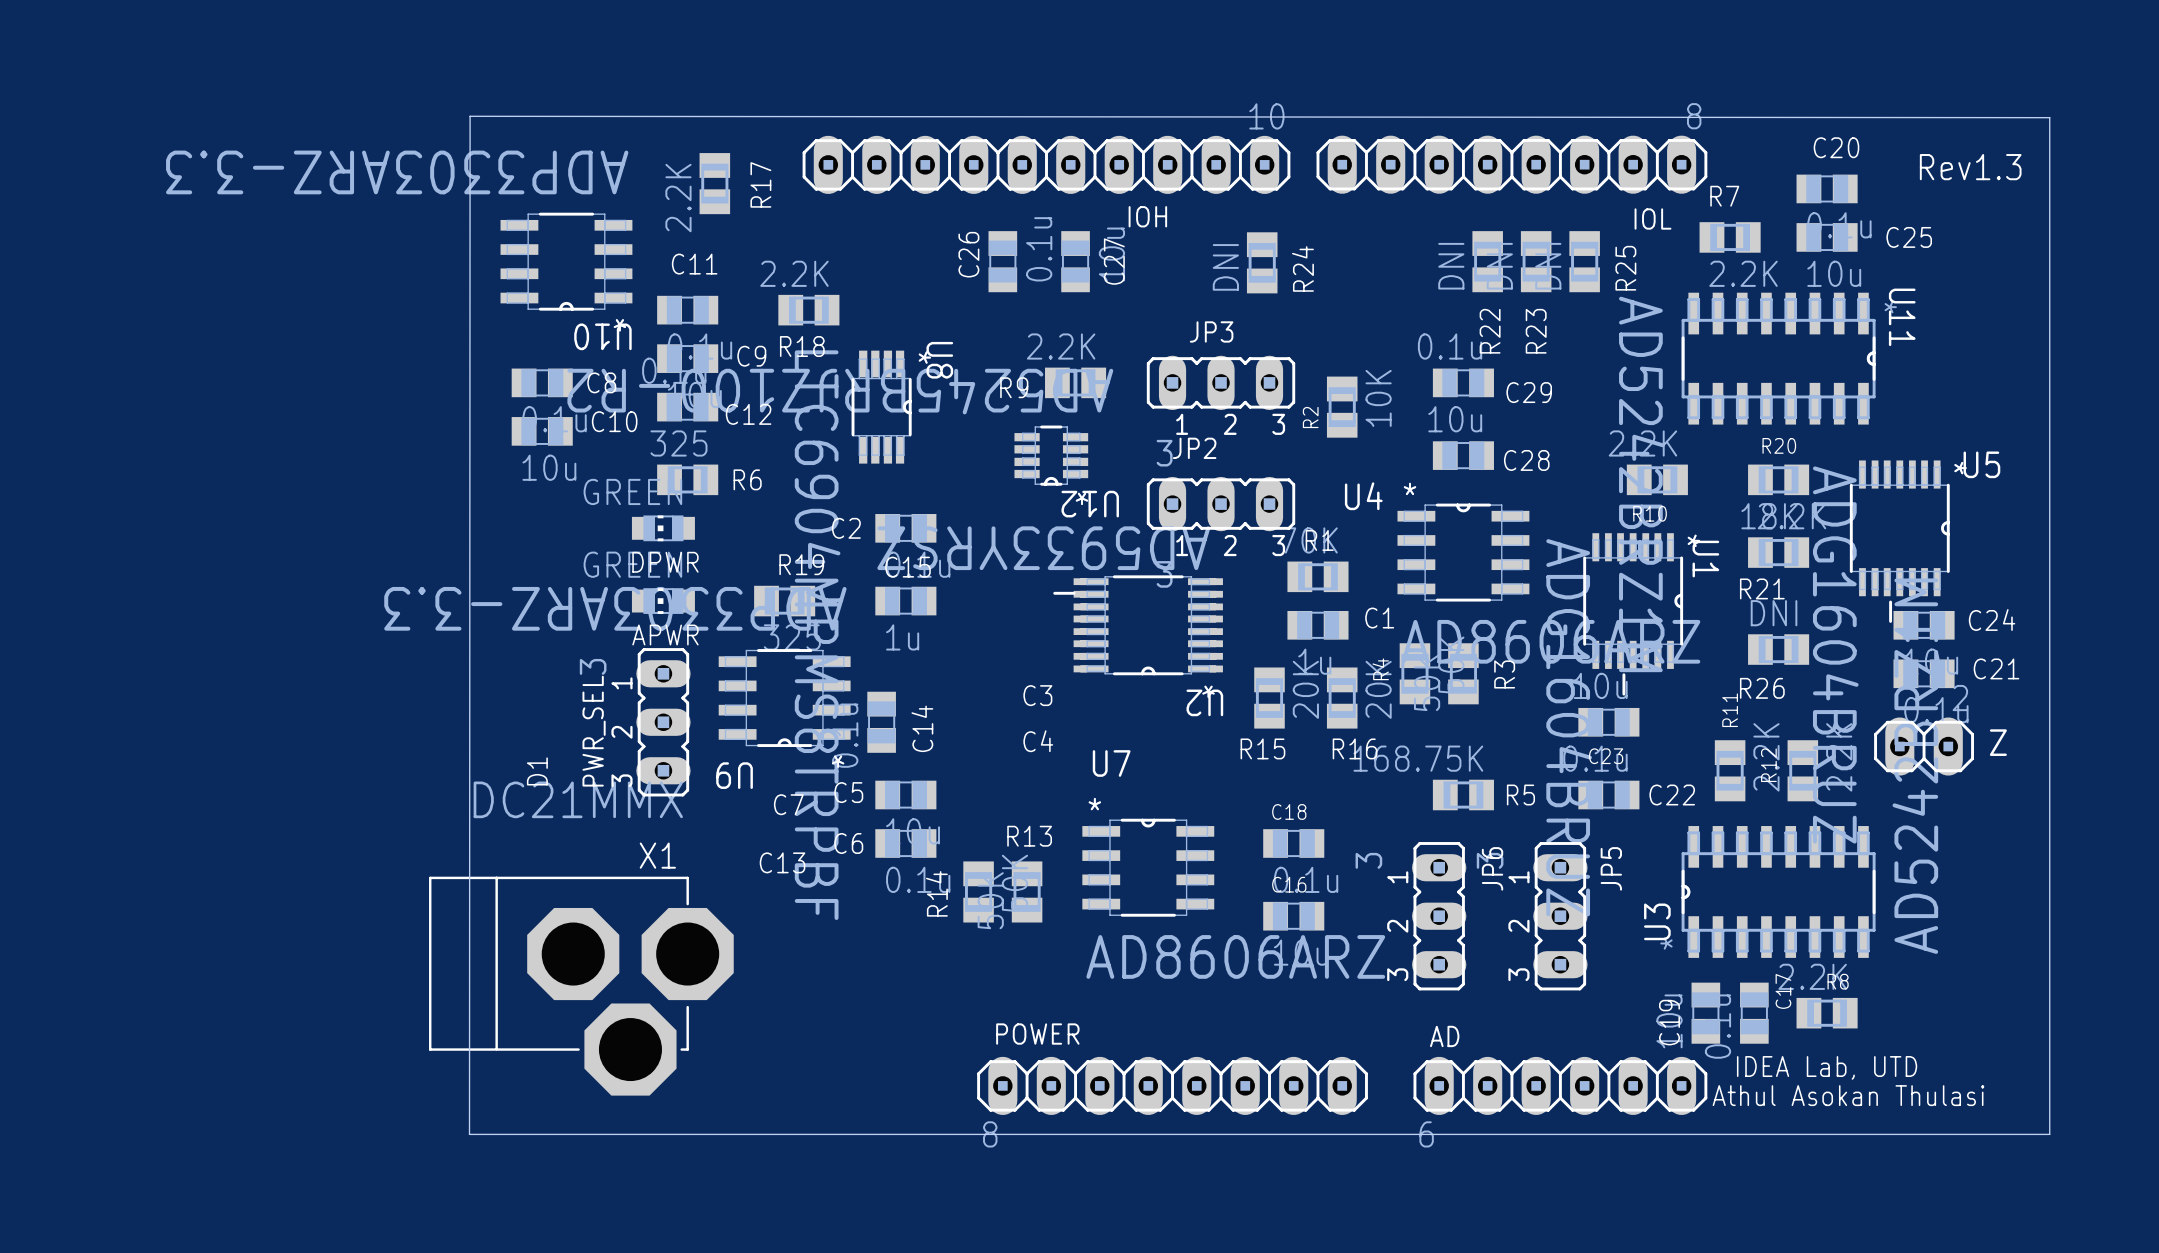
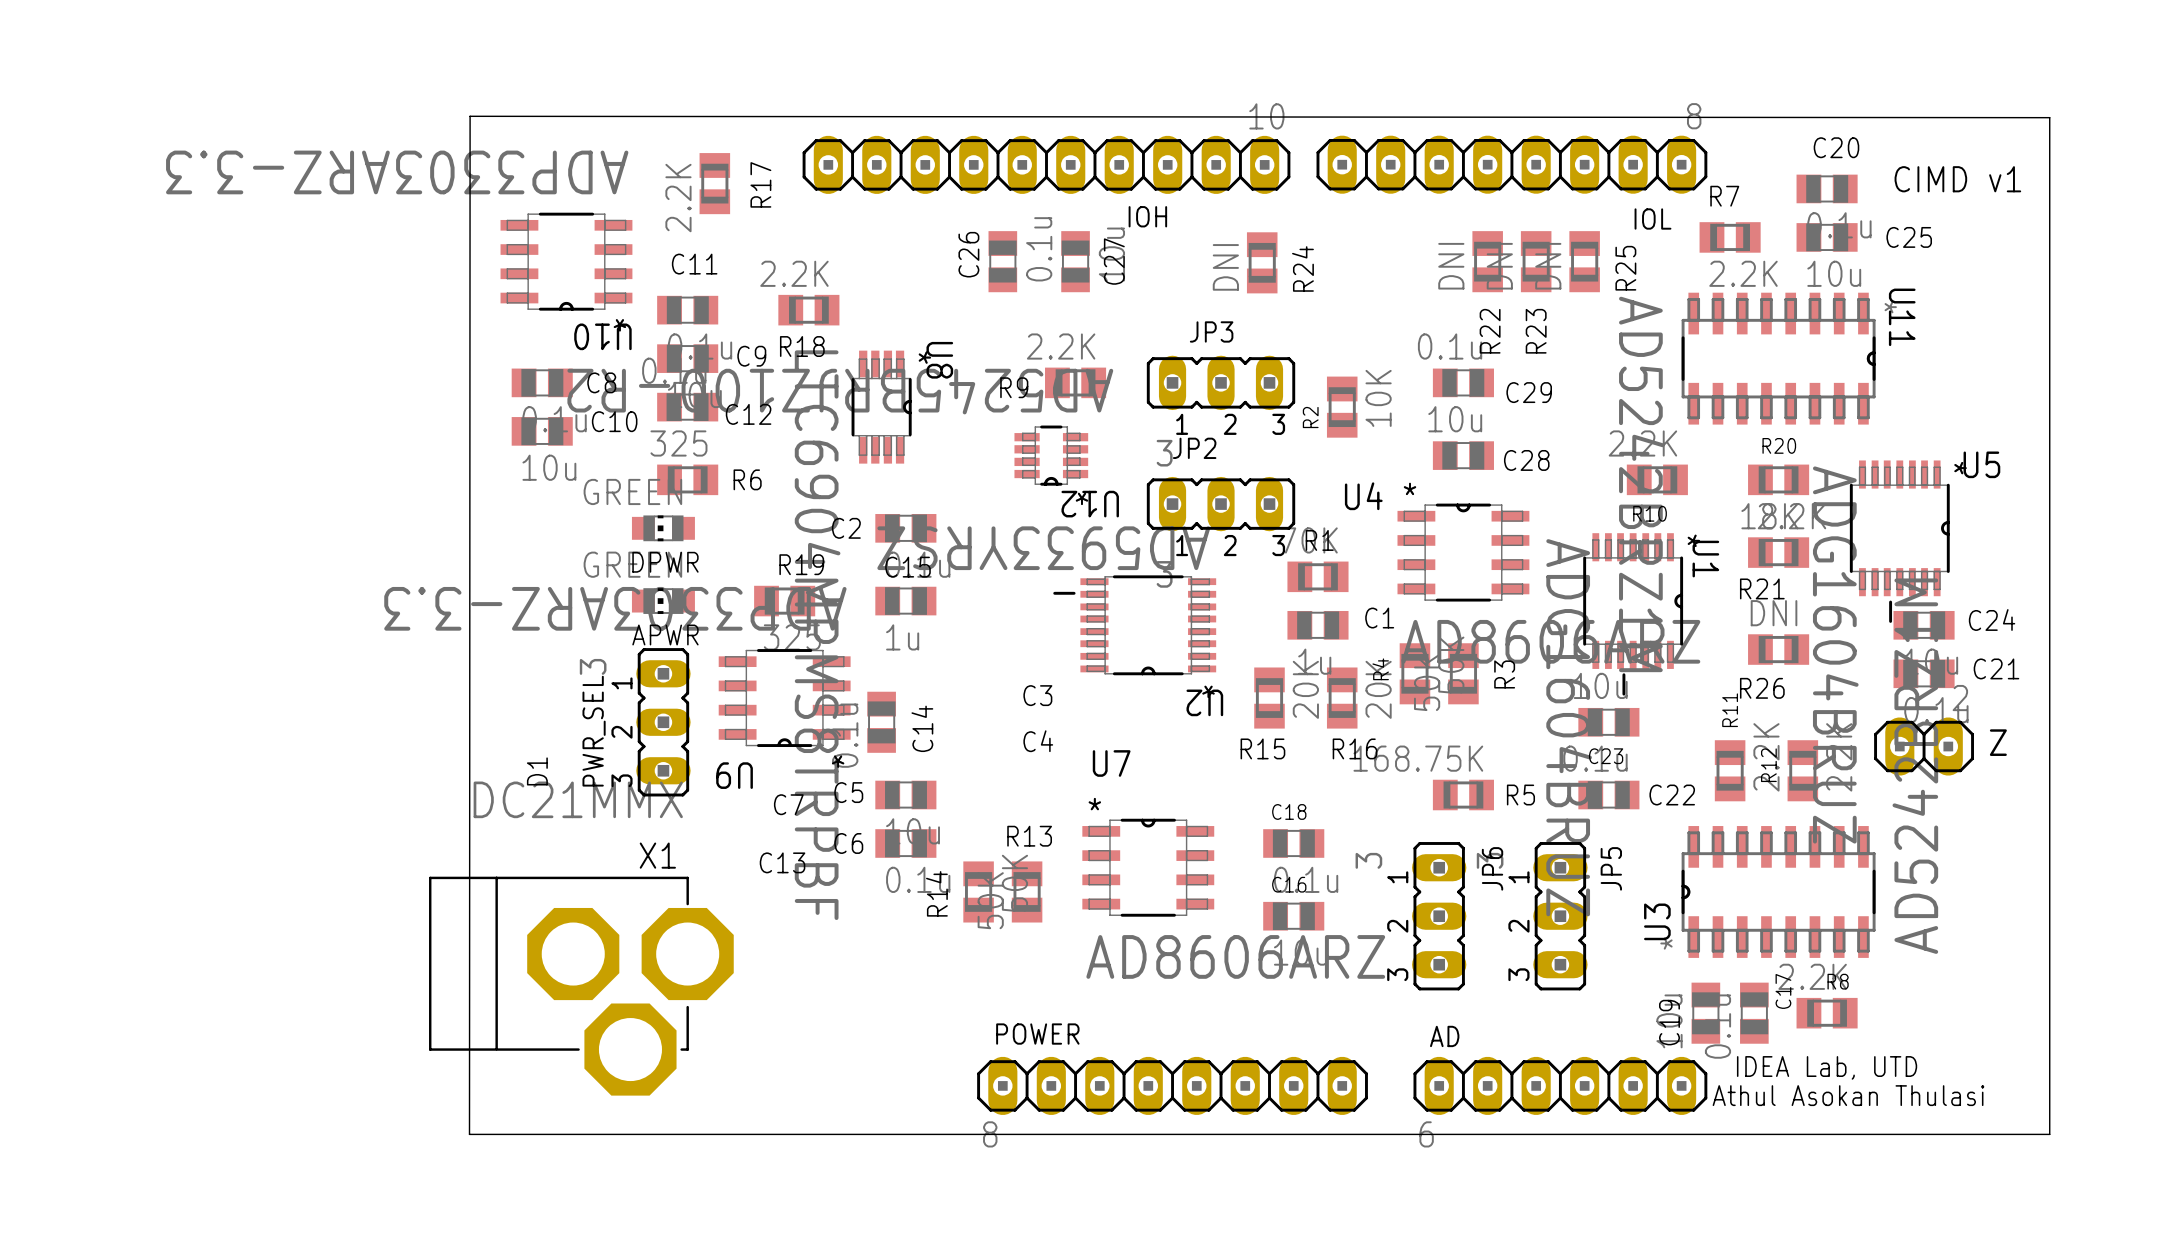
text: Rev1.3 (1970, 167) -> none
text: none -> CIMD v1 (1957, 179)
U2 footprint: [1053, 575, 1223, 676] -> [1053, 575, 1217, 676]

